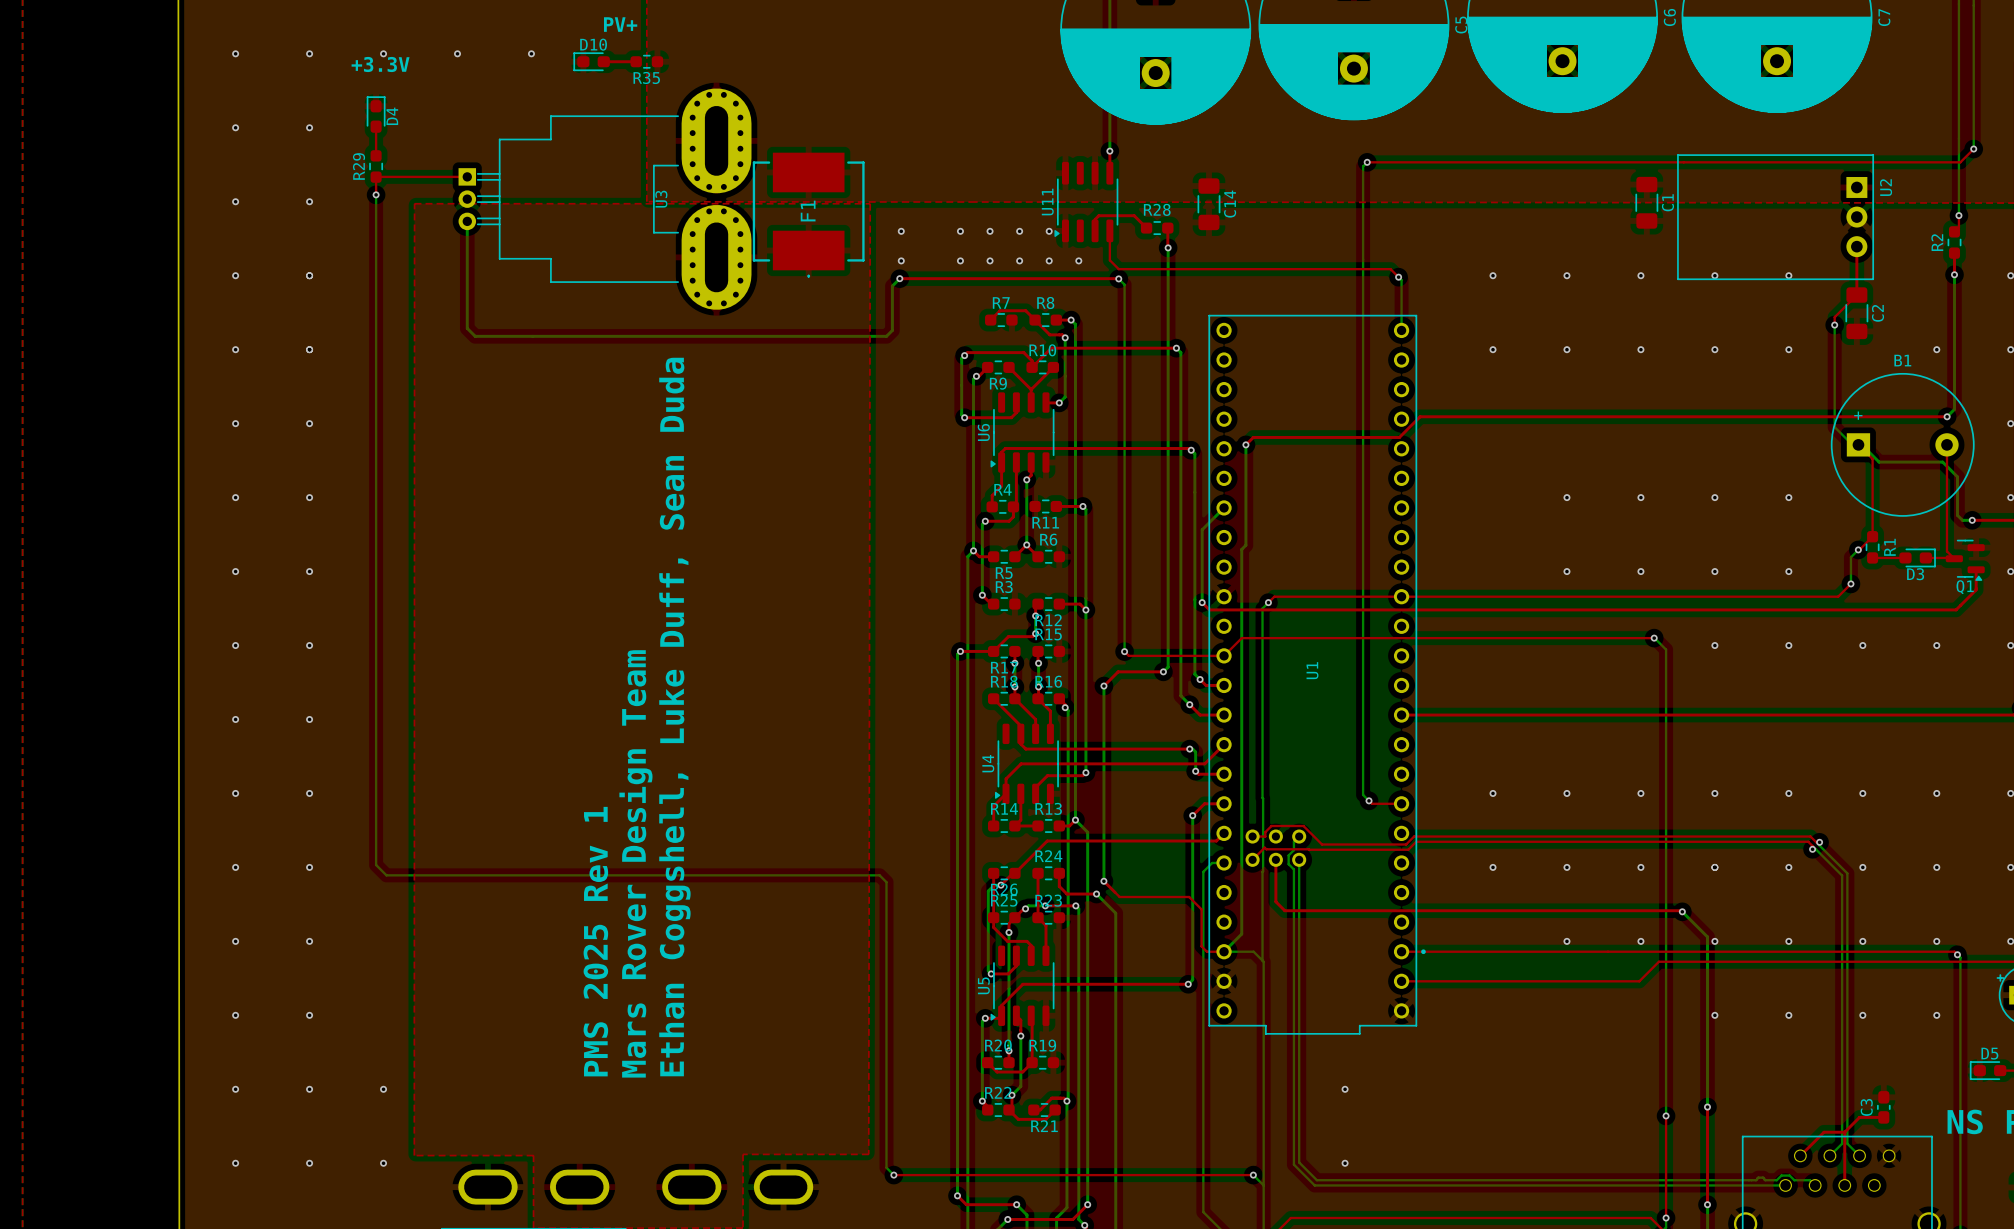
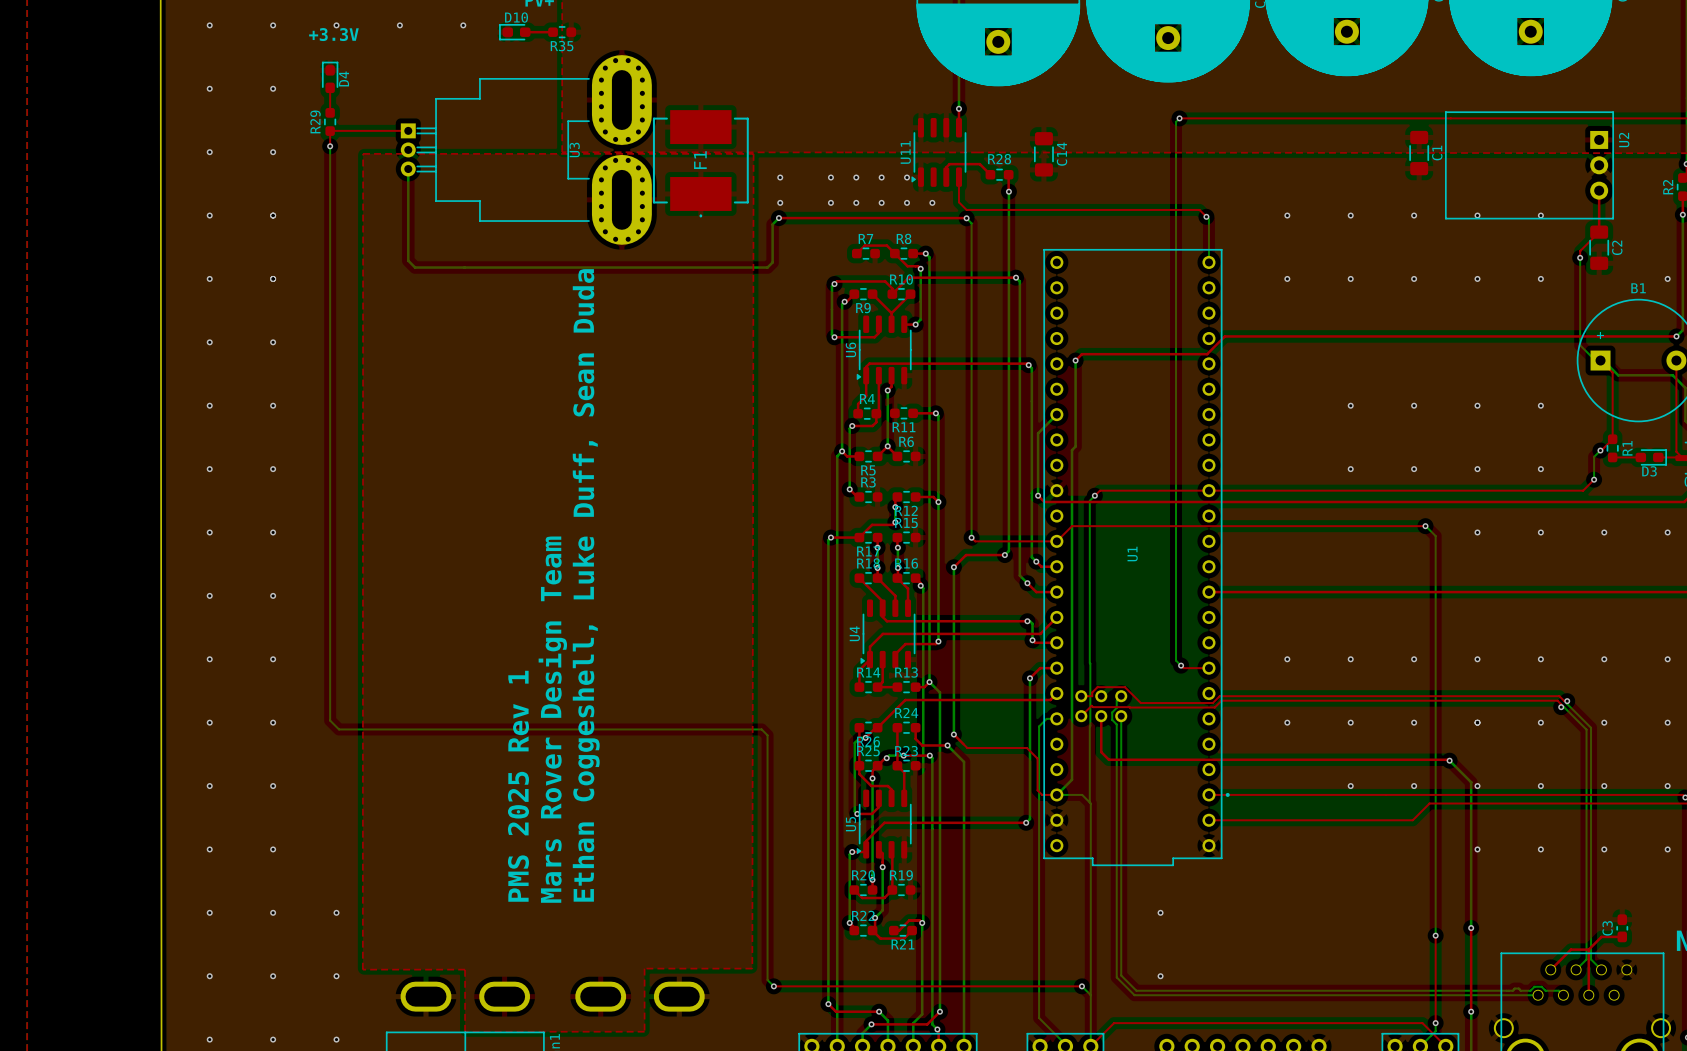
text: Ethan Coggshell, Luke Duff, Sean Duda (674, 717) -> Ethan Coggeshell, Luke Duff, Sean Duda (586, 585)

